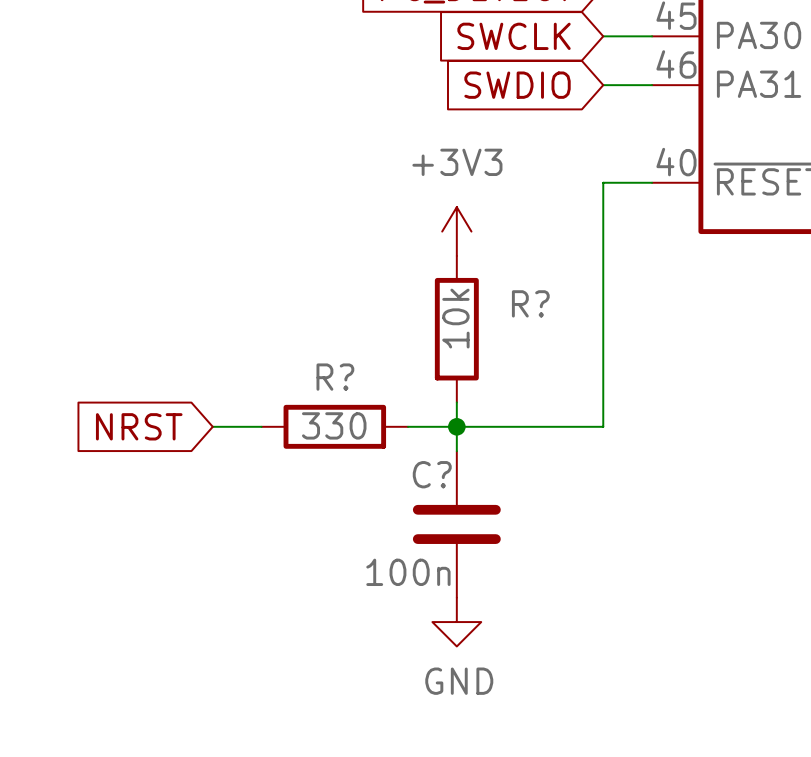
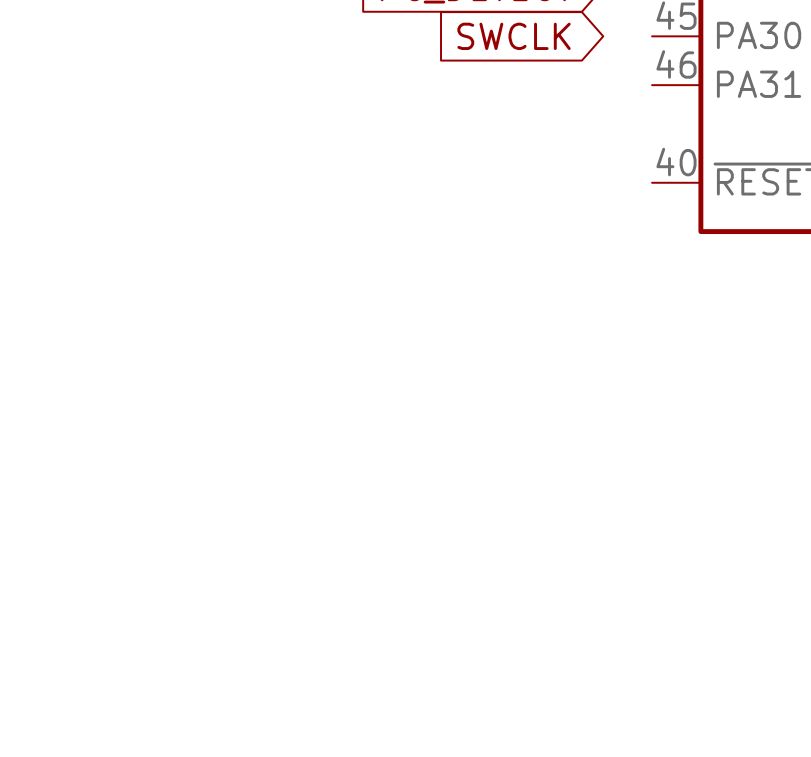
wire: (603, 36) (652, 36) -> none
global label: SWDIO (517, 85) -> none
wire: (603, 85) (652, 85) -> none
wire: (652, 182) (603, 182) (603, 426) (408, 426) -> none
power symbol: +3V3 (456, 231) -> none
R?: 10k (456, 329) -> none
wire: (456, 402) (456, 451) -> none
global label: NRST (139, 426) -> none
wire: (212, 426) (261, 426) -> none
R?: 330 (334, 426) -> none
junction: (456, 426) -> none
C?: 100n (456, 524) -> none
power symbol: GND (456, 622) -> none

